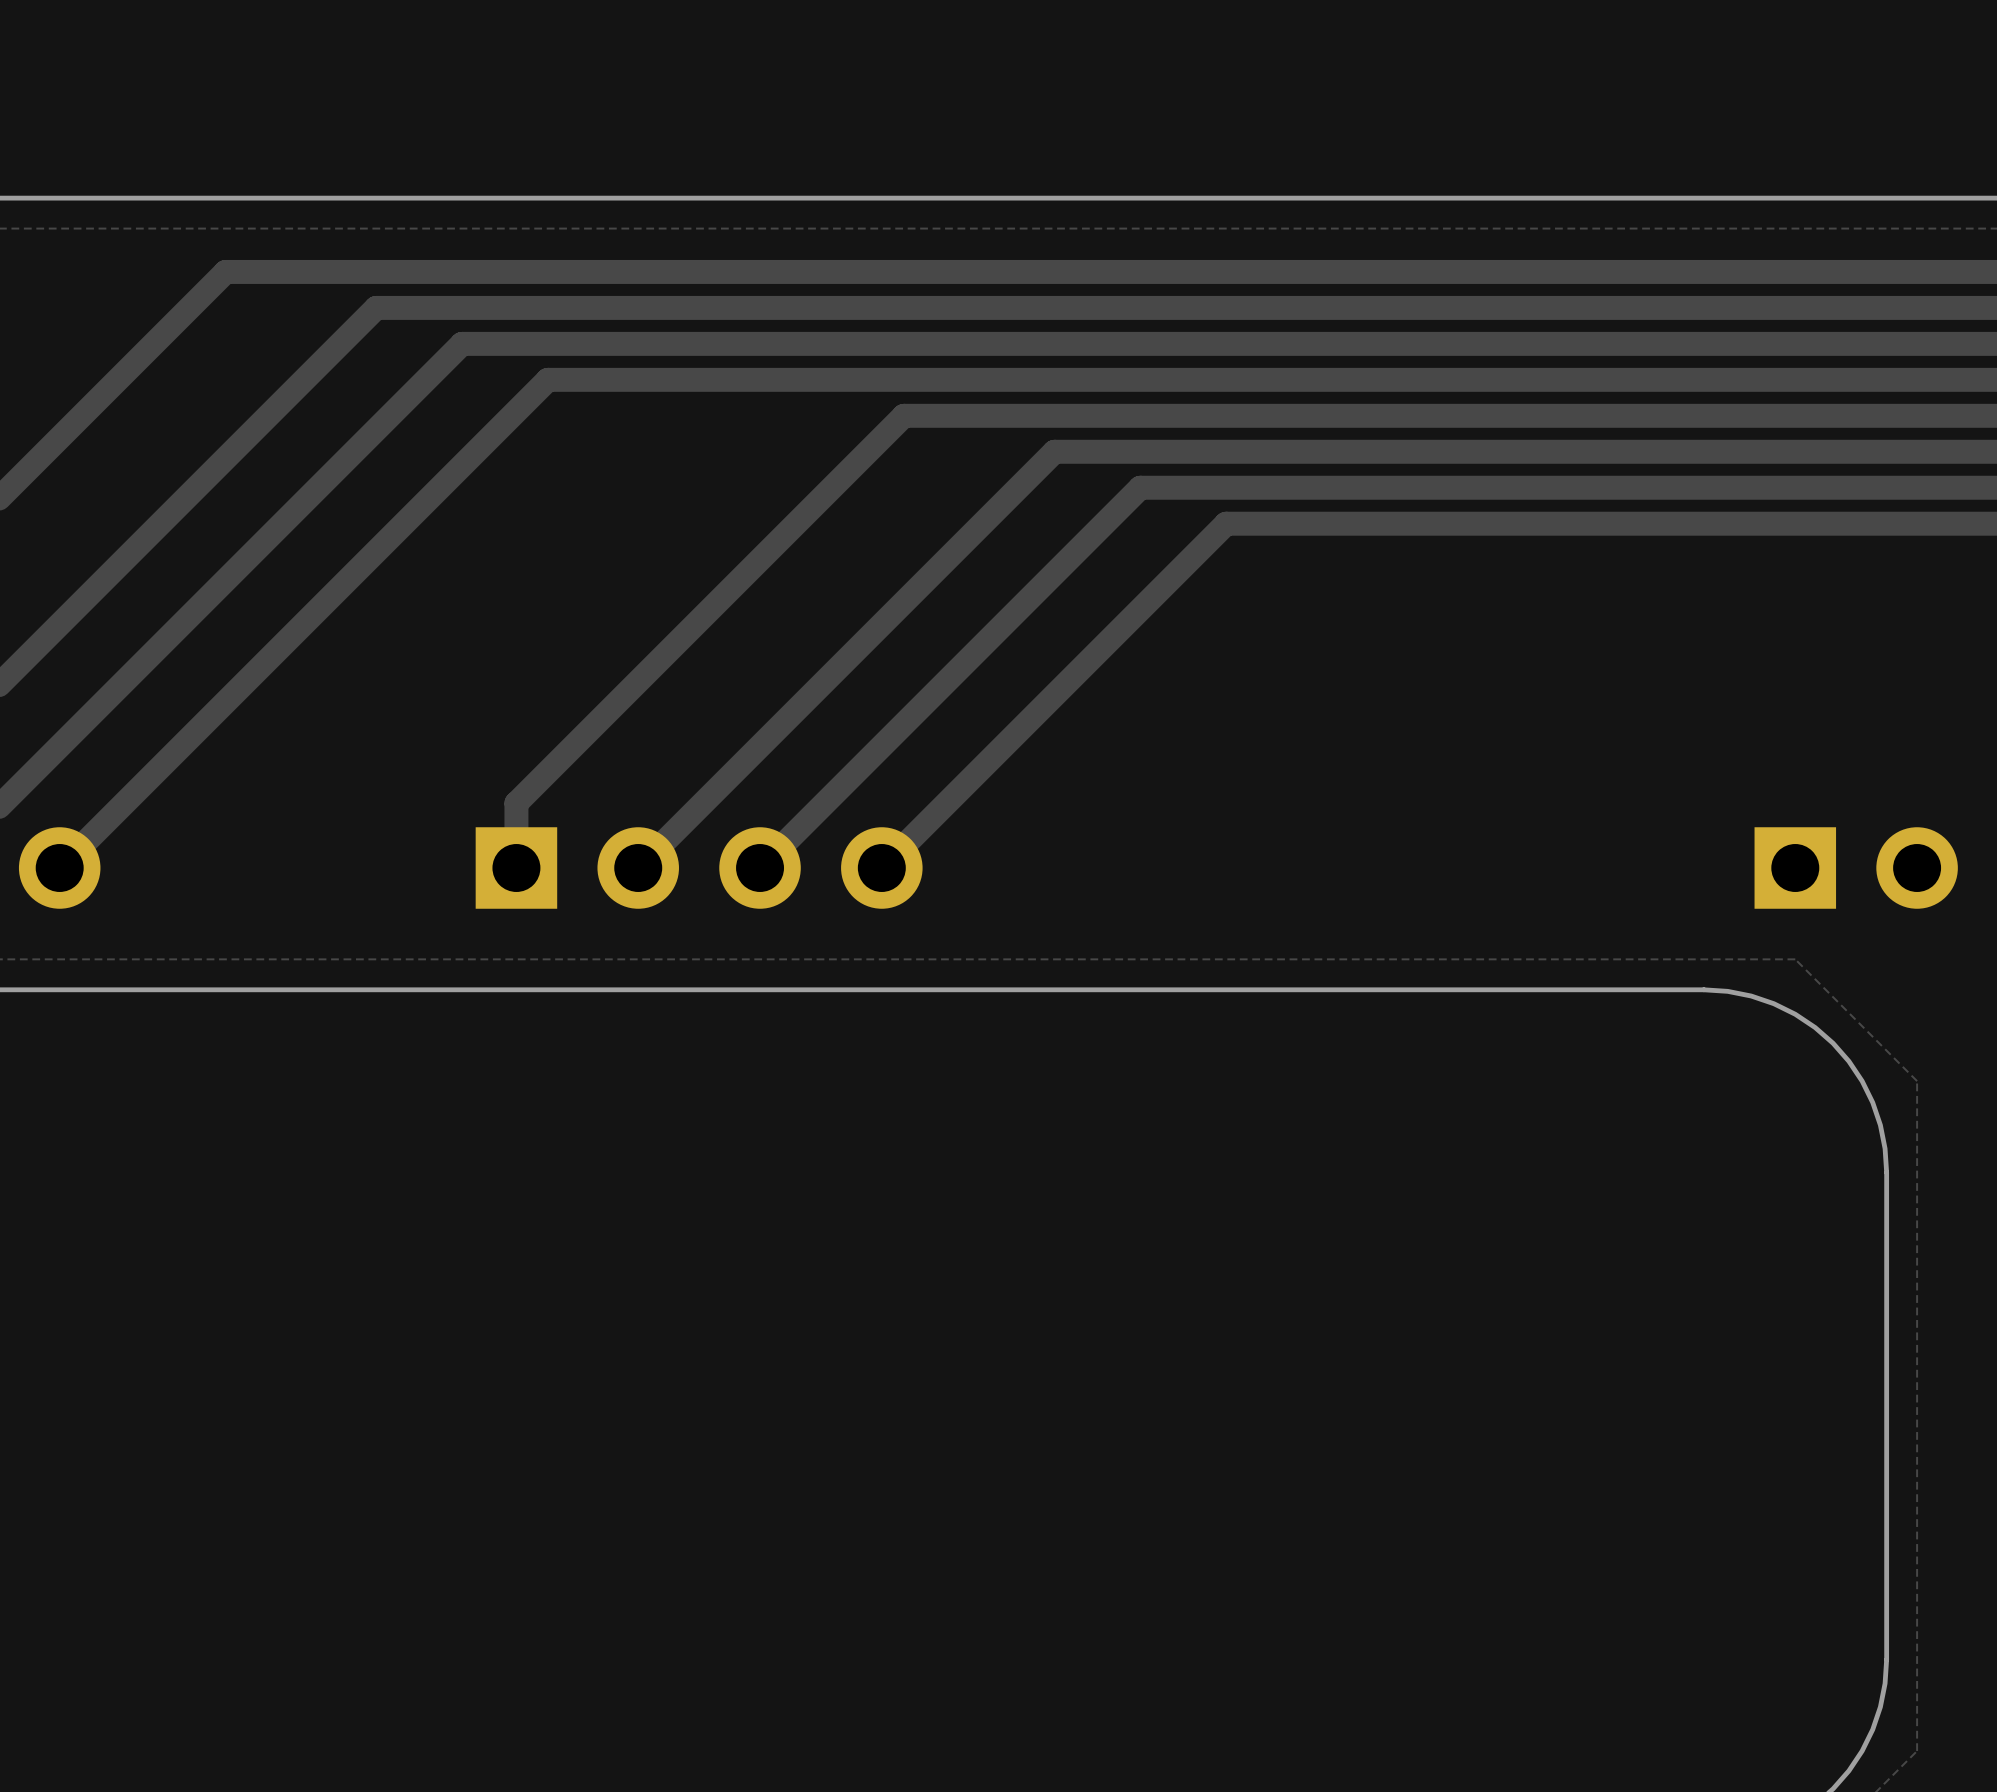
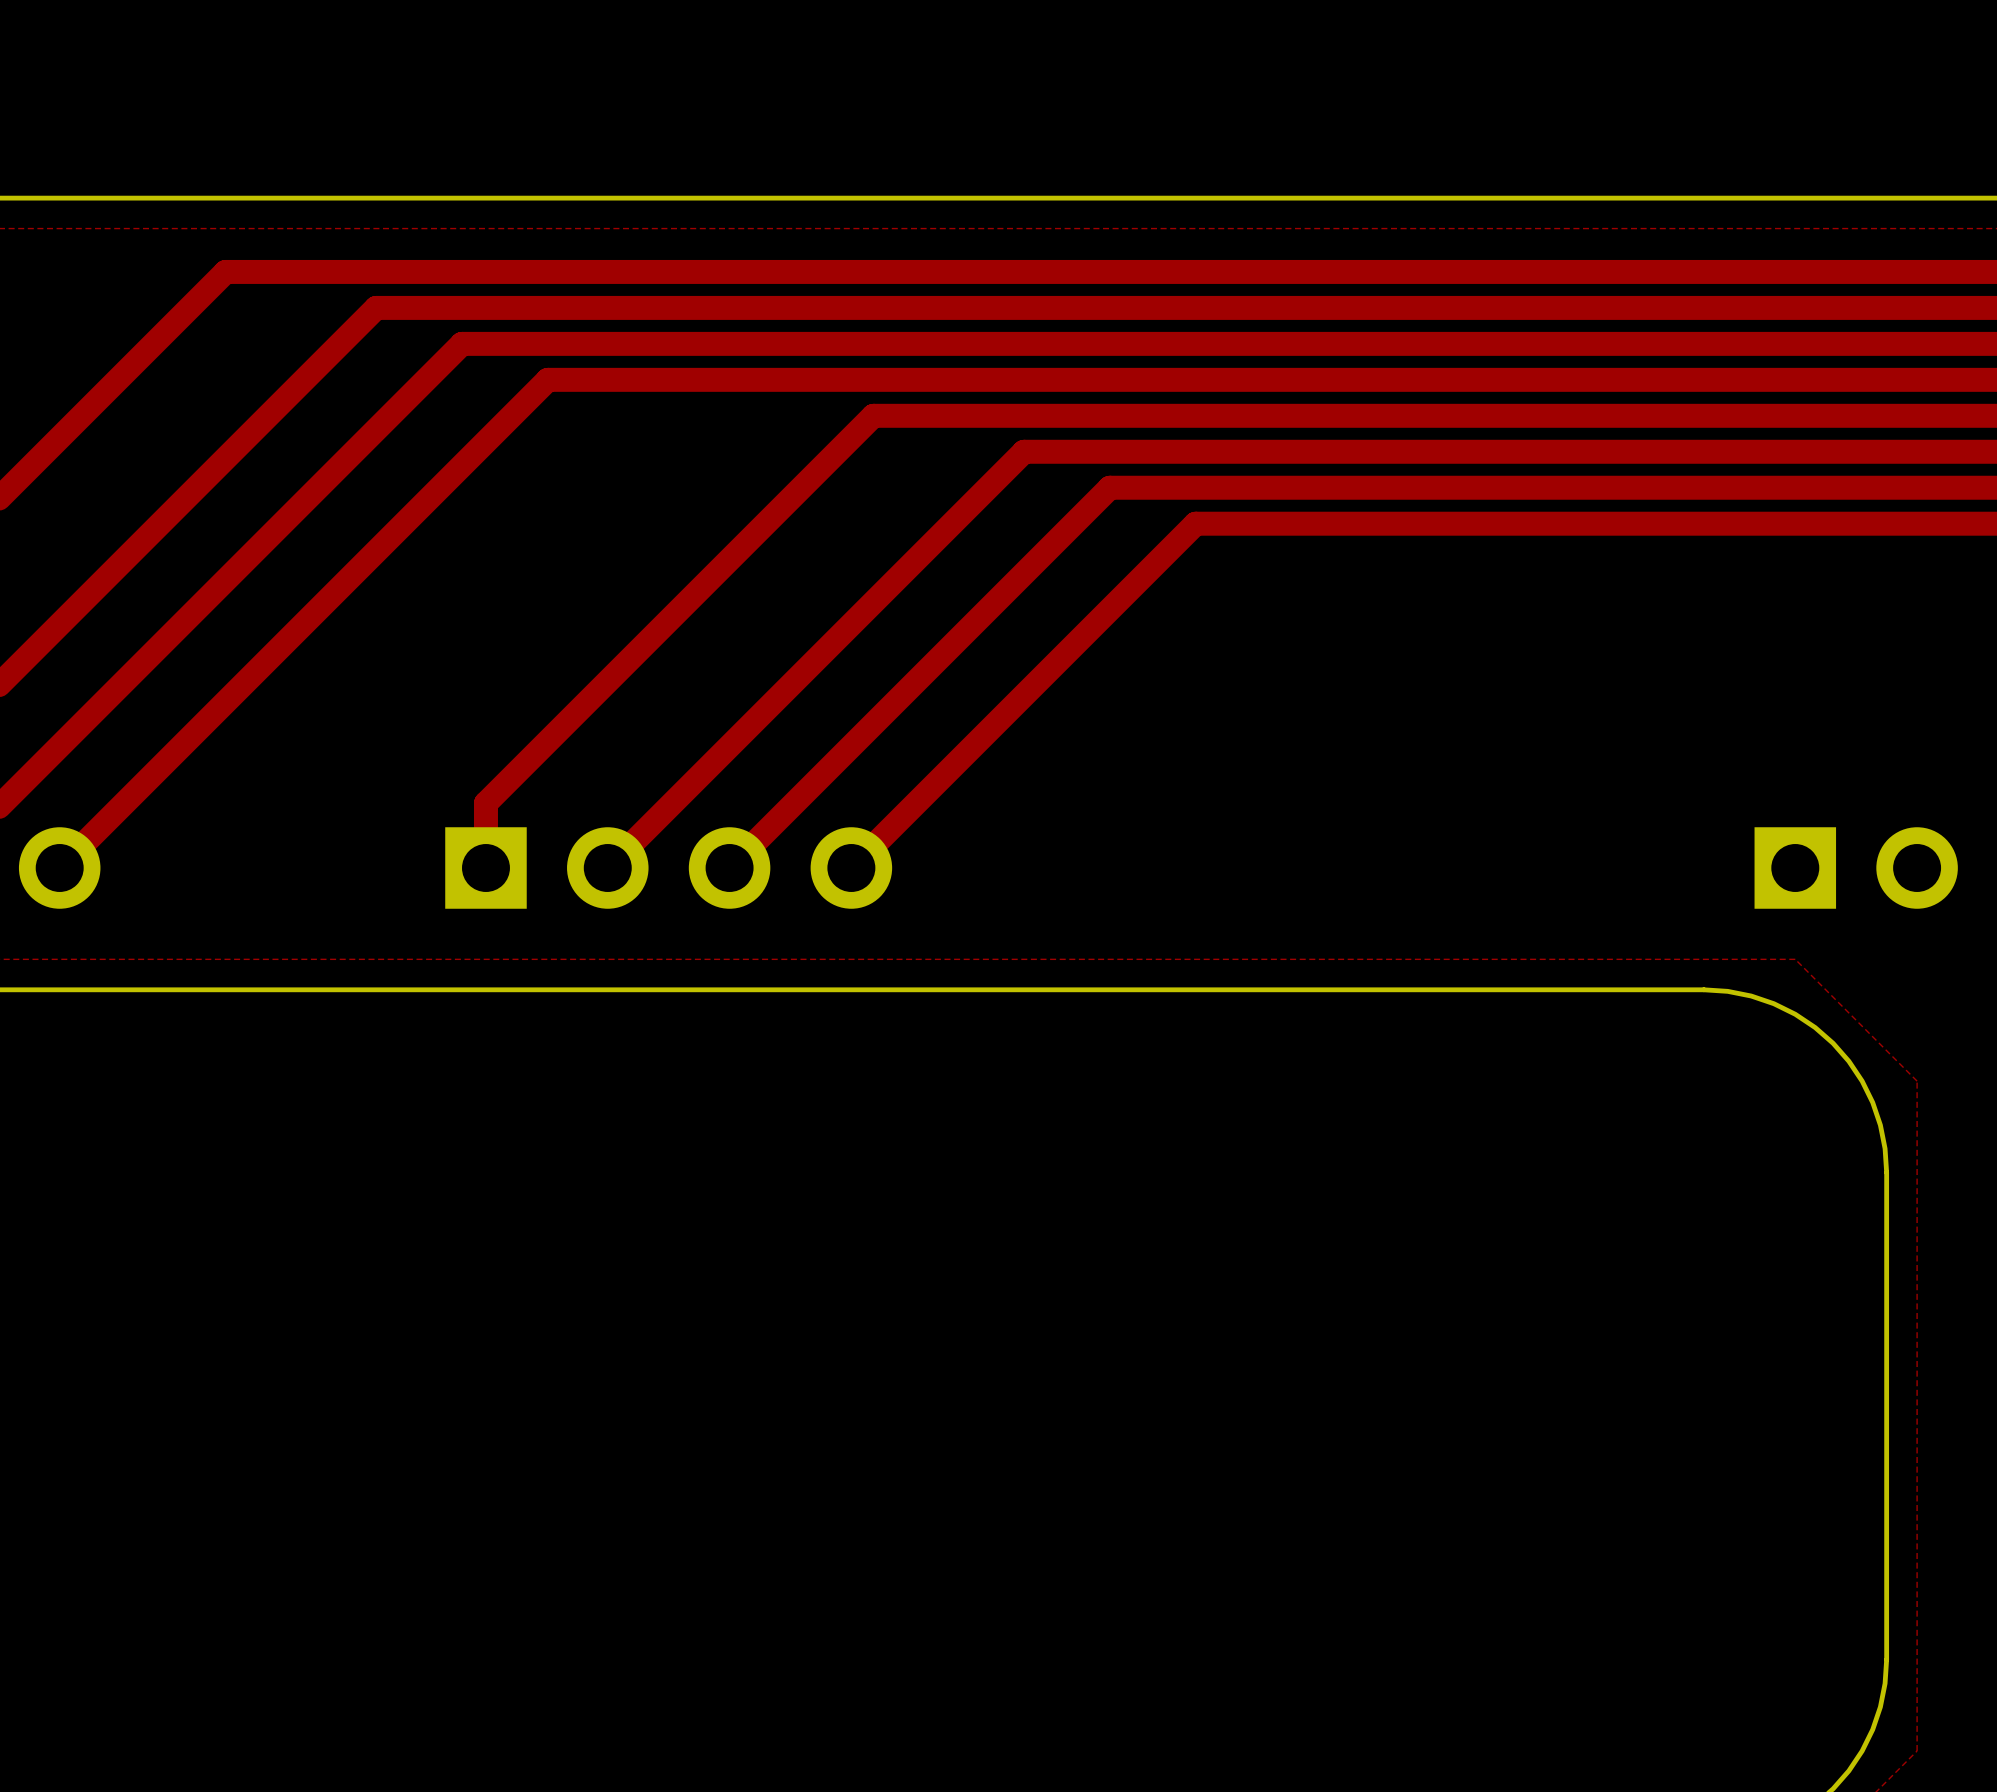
track: (903, 415) (516, 803) (516, 868) -> (903, 415) (873, 415) (485, 803) (485, 868)
track: (1054, 451) (638, 868) -> (1054, 451) (1024, 451) (607, 868)
track: (1140, 487) (760, 868) -> (1140, 487) (1109, 487) (729, 868)
track: (1226, 523) (881, 868) -> (1226, 523) (1195, 523) (851, 868)
part position: (699, 868) -> (668, 868)

